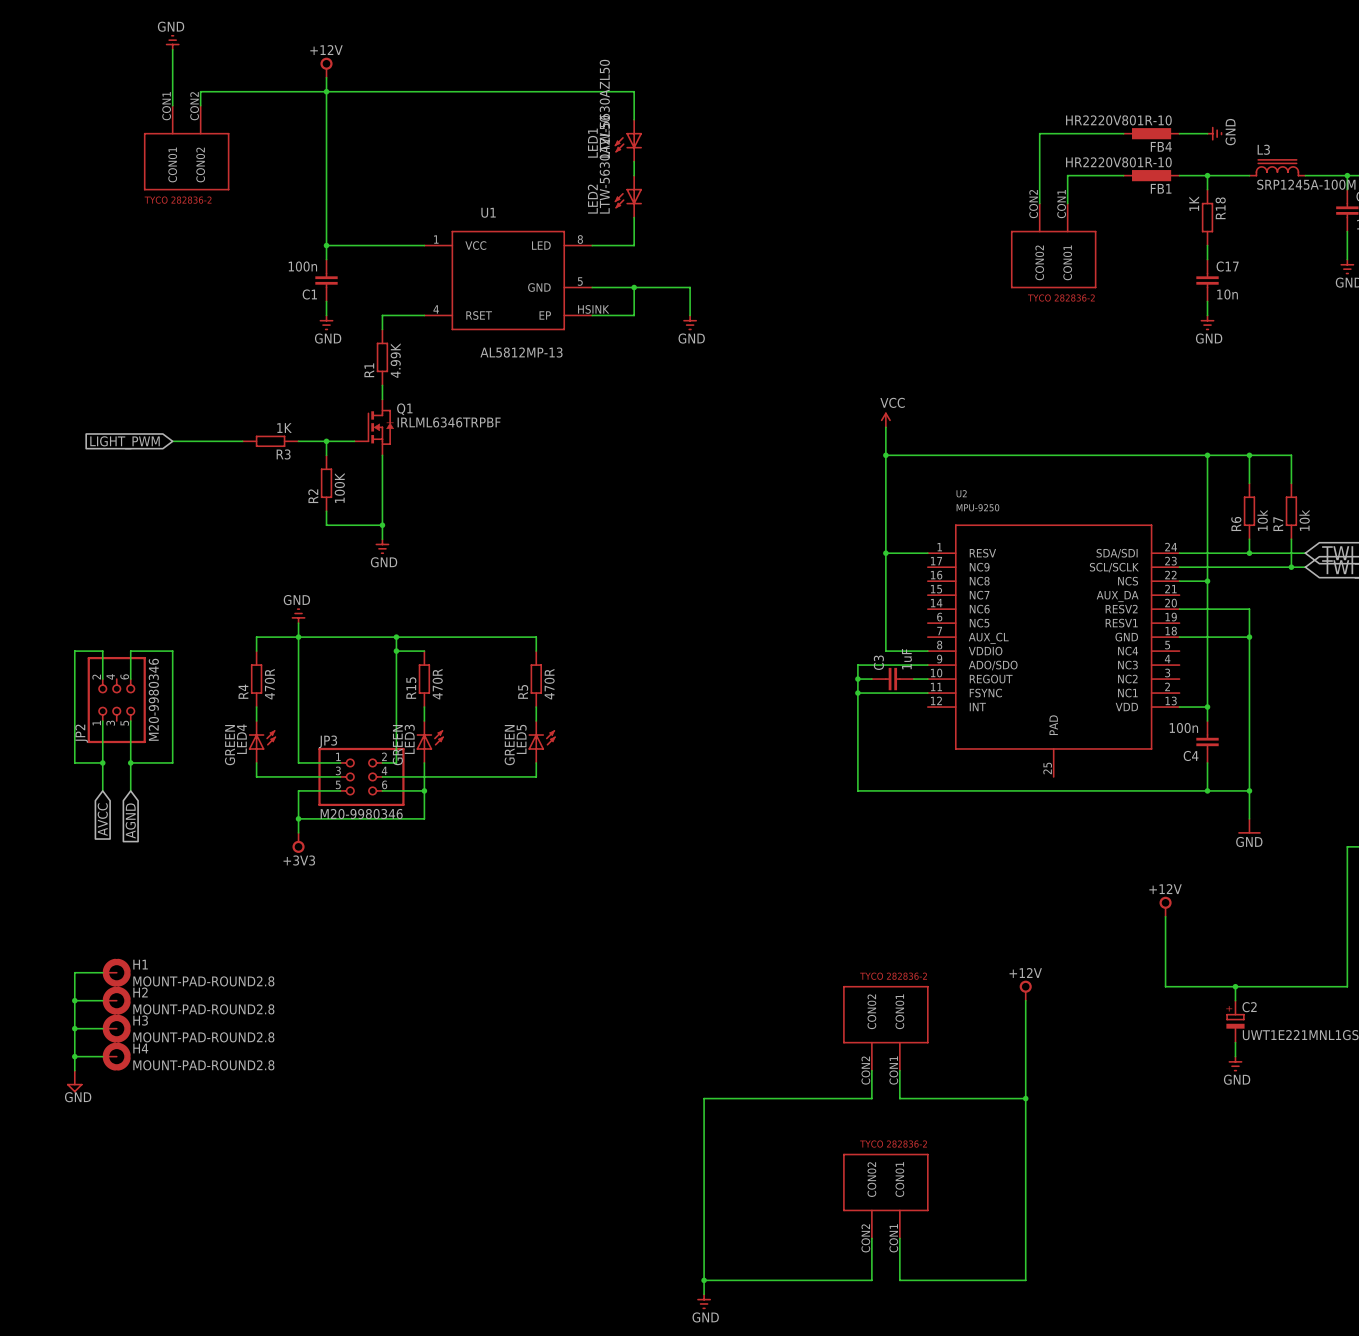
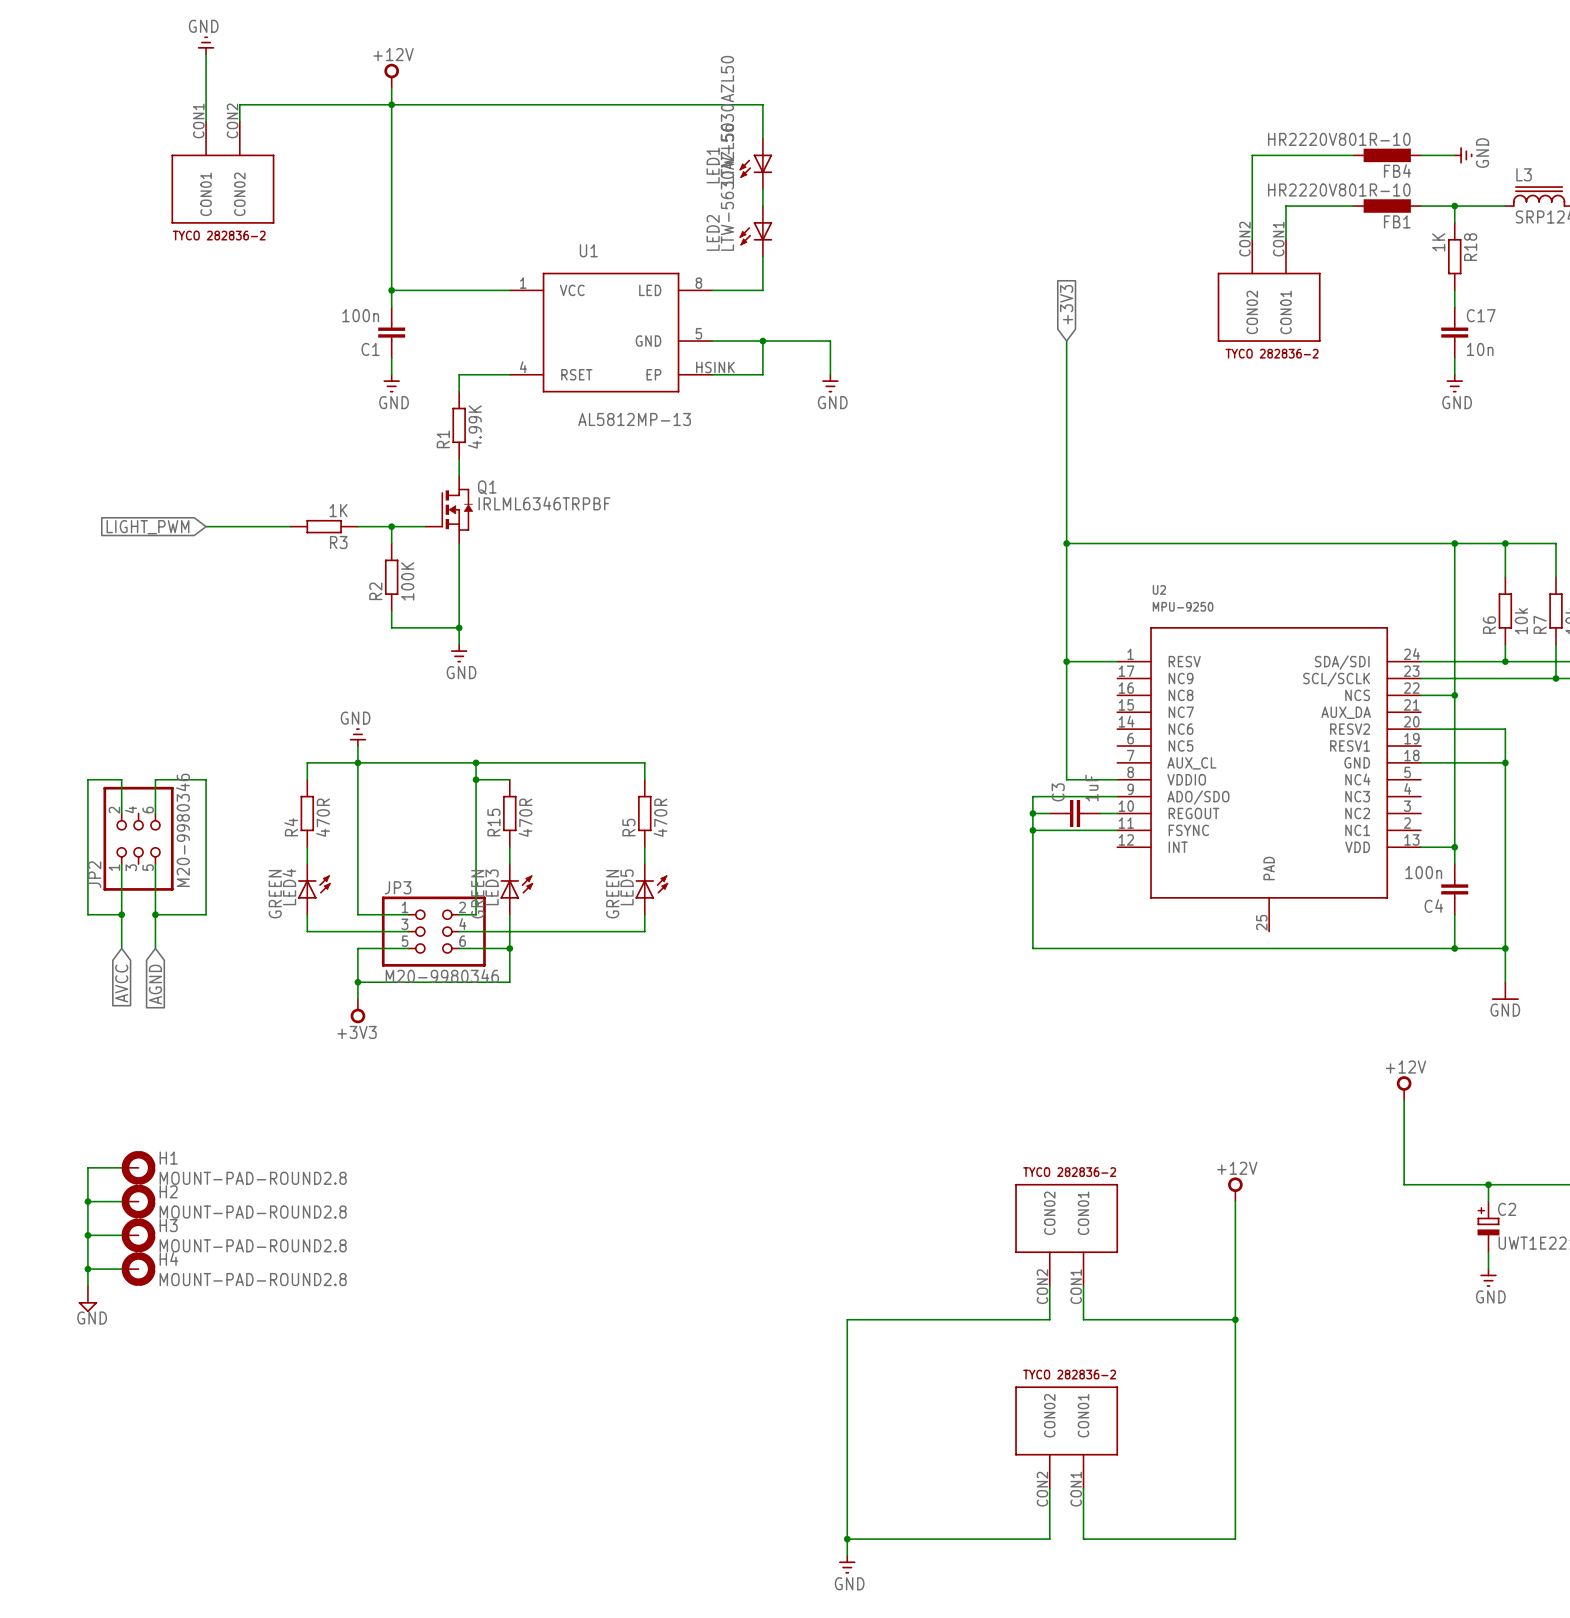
global label: none -> +3V3 (1066, 304)
wire: none -> (1066, 341) (1066, 509)
power symbol: VCC (885, 420) -> none

